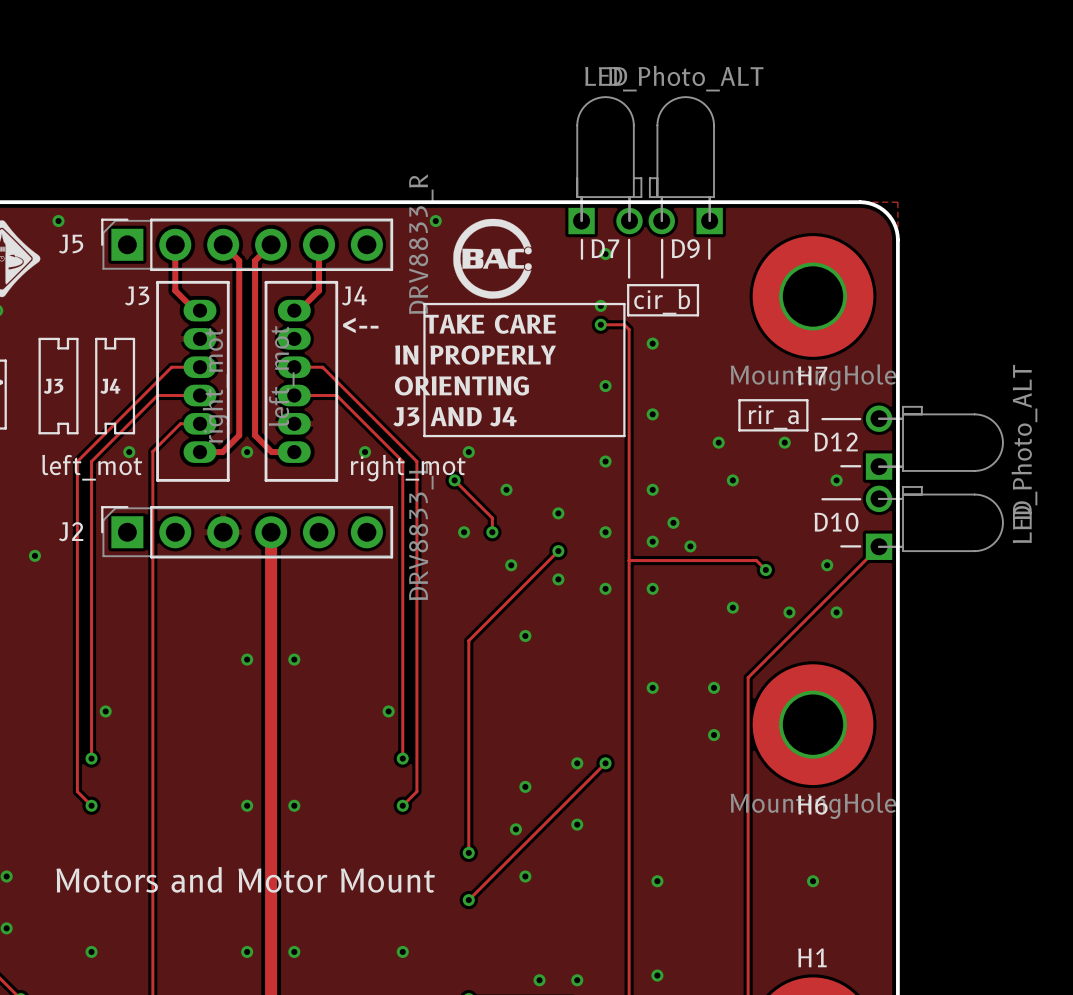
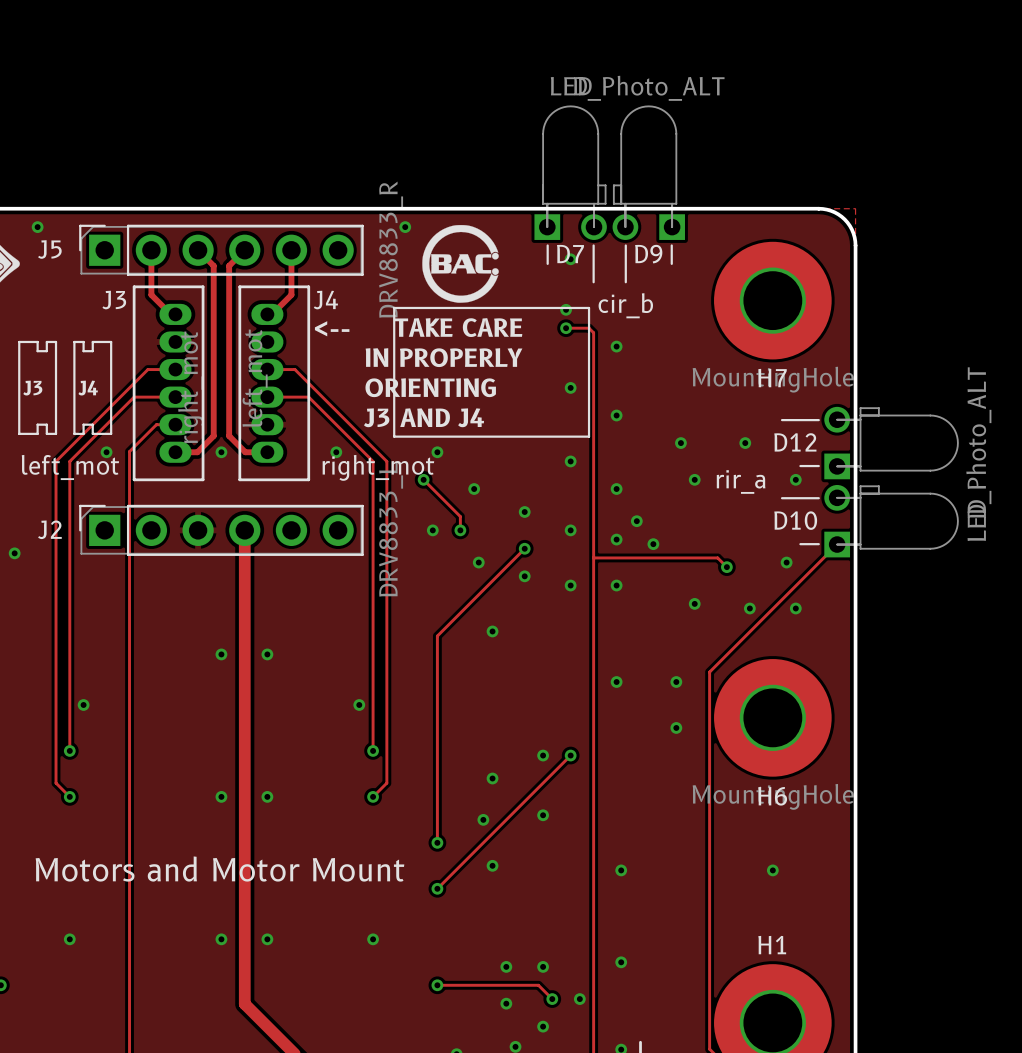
line: (628, 285) (697, 285) (697, 315) (628, 315) (628, 285) -> none
line: (739, 400) (807, 400) (807, 430) (739, 430) (739, 400) -> none
text position: rir_a (773, 417) -> rir_a (741, 482)

